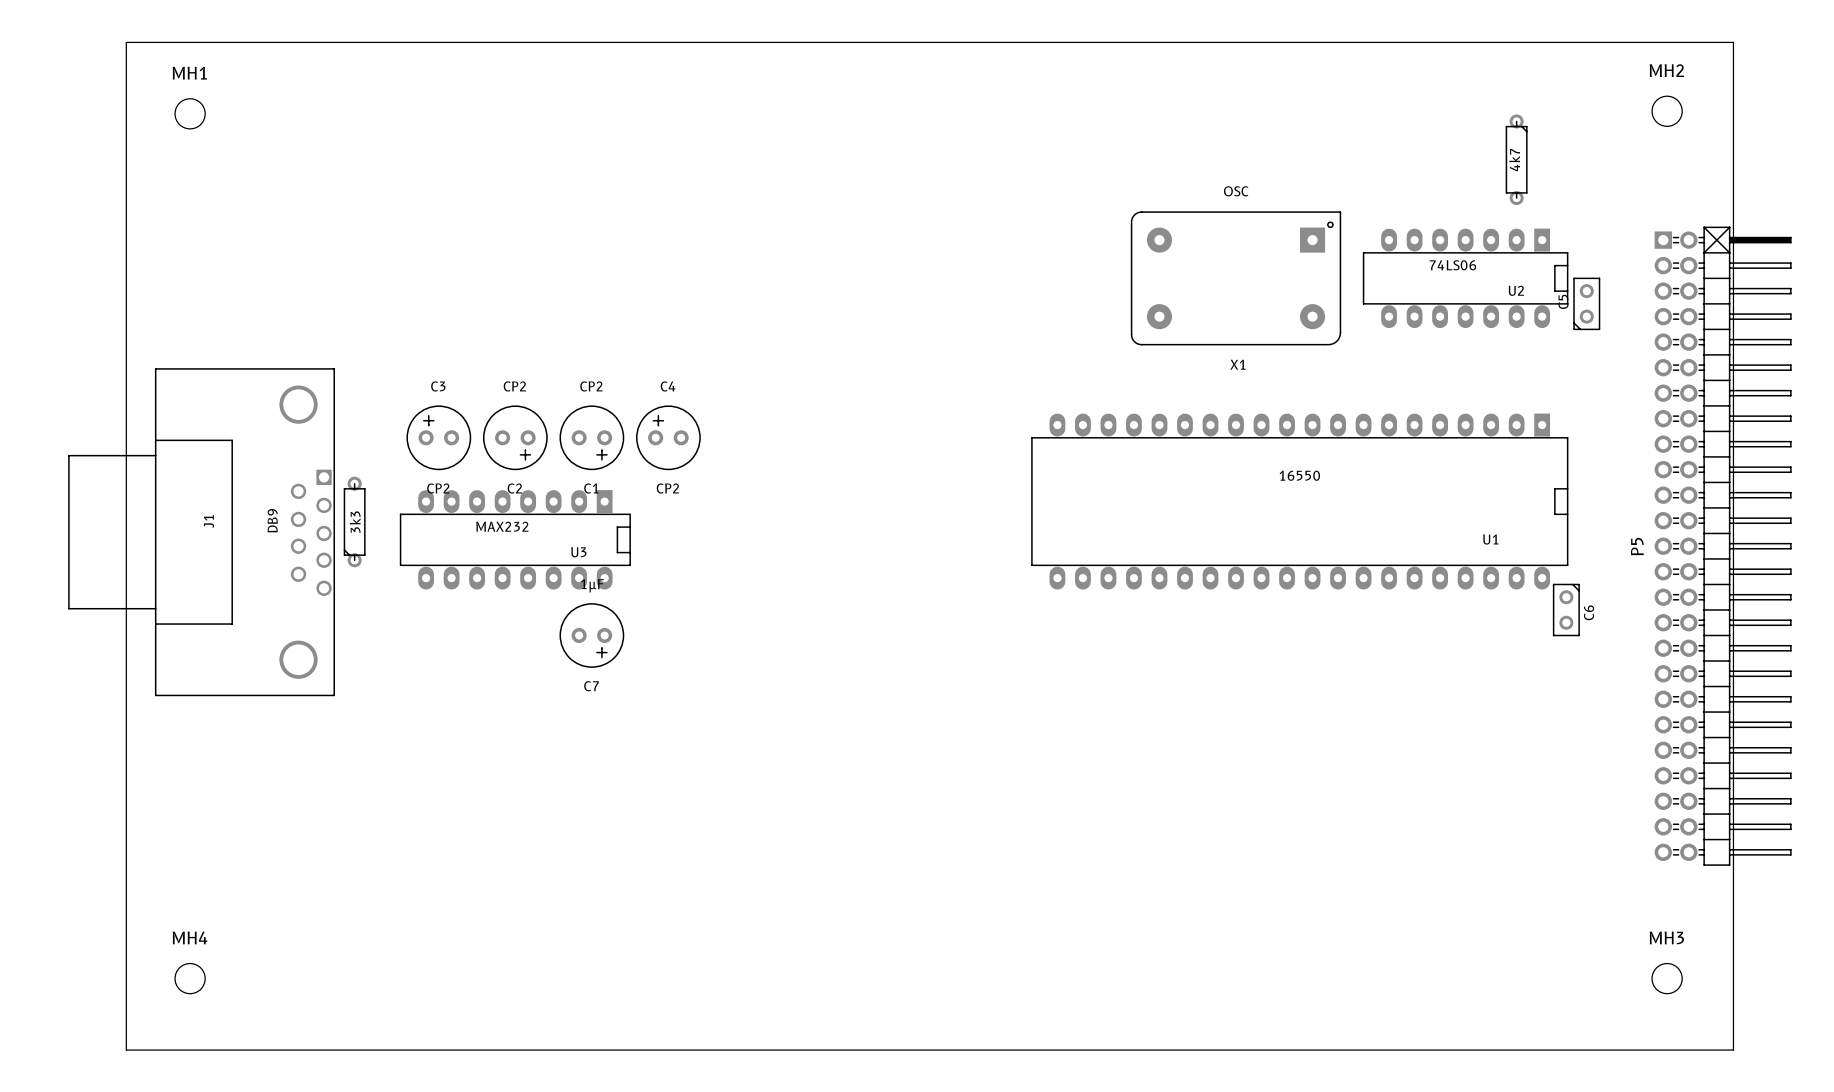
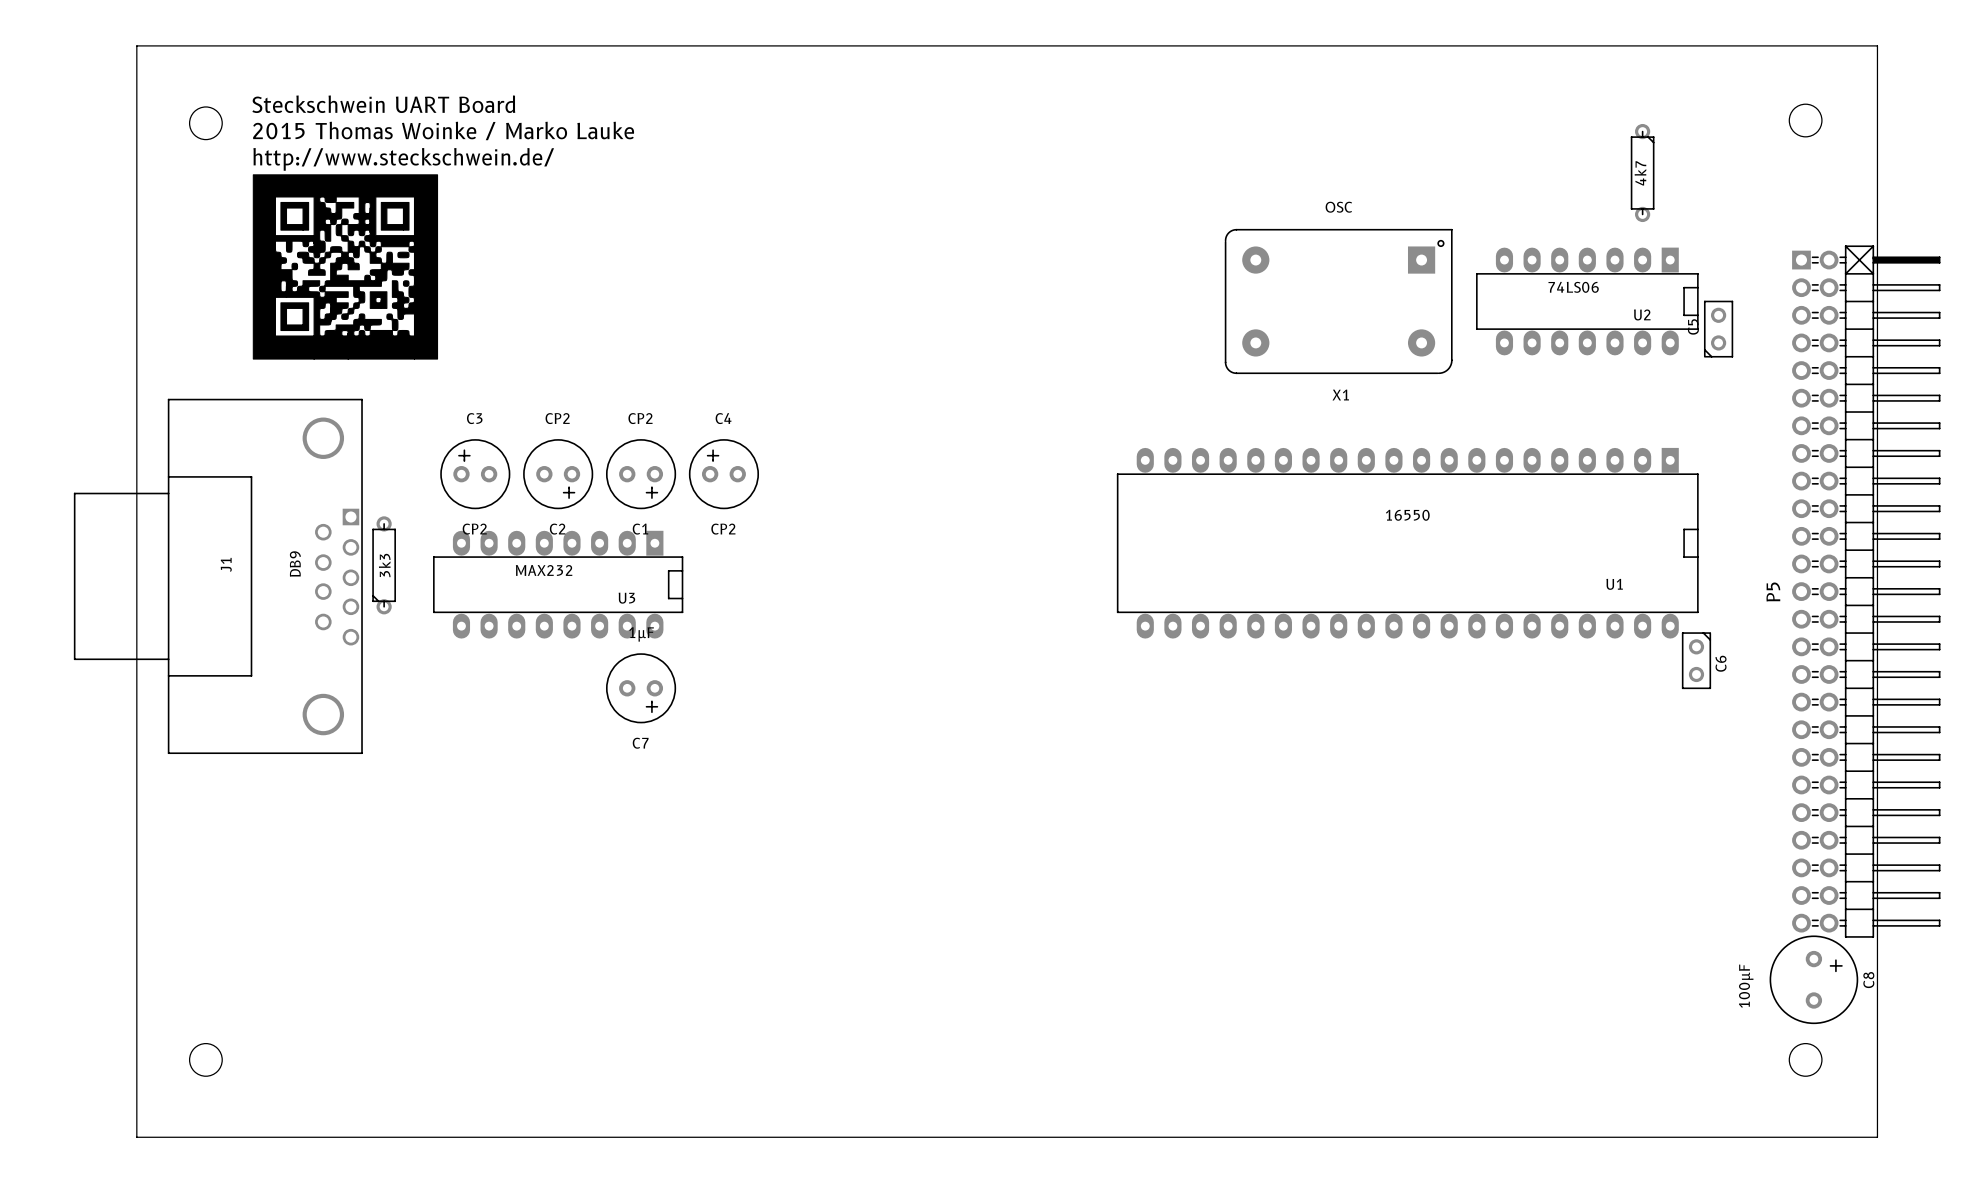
MH2 name: MH2 (1666, 70) -> none
MH1 name: MH1 (189, 73) -> none
text: none -> Steckschwein UART Board (383, 104)
text: none -> 2015 Thomas Woinke / Marko Lauke (443, 130)
text: none -> http://www.steckschwein.de/ (403, 159)
drawing: none -> [252, 174, 439, 360]
C8: none -> 100µF (1813, 979)
MH4 name: MH4 (189, 937) -> none
MH3 name: MH3 (1666, 937) -> none

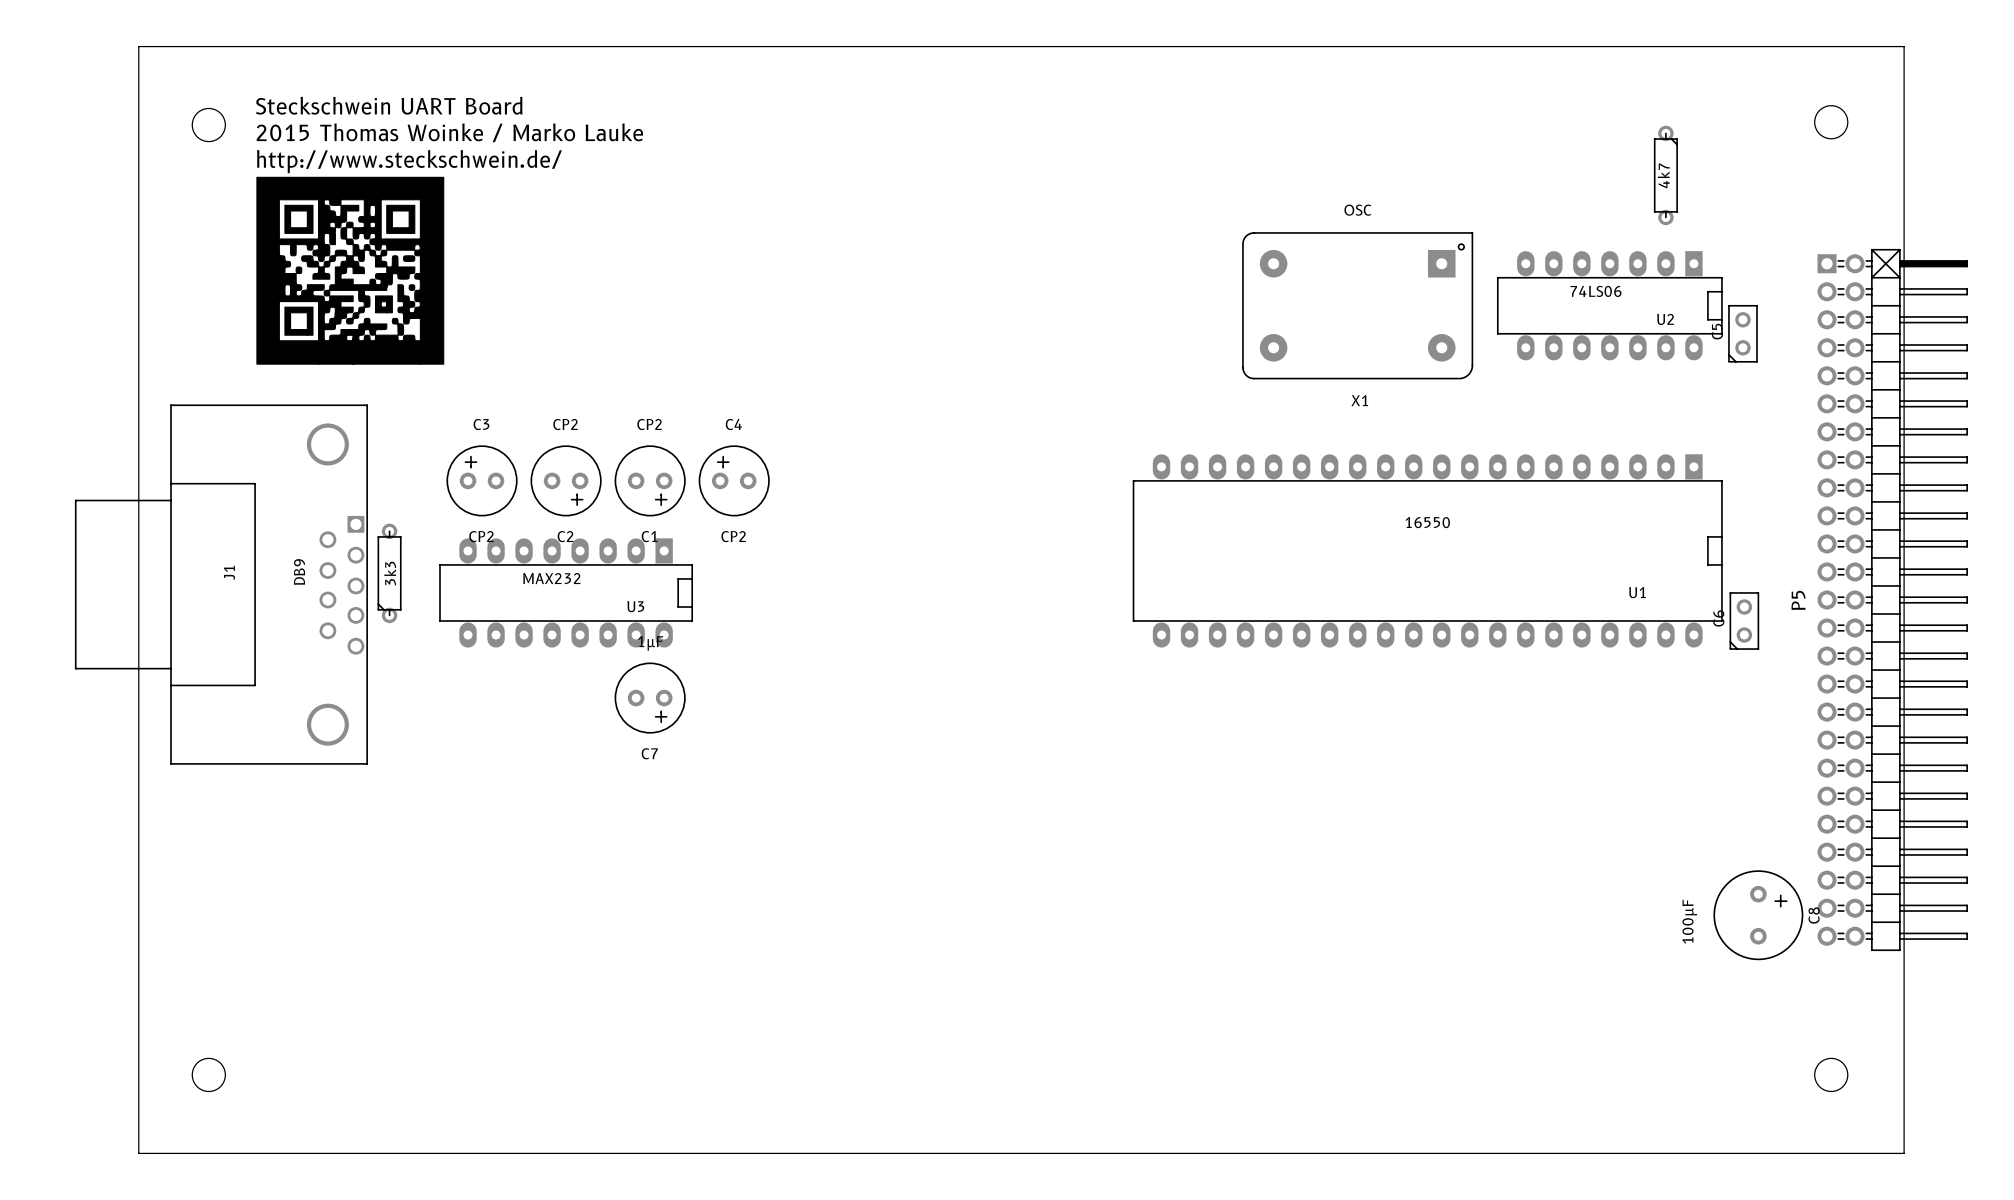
C6 rotation: 0° (1696, 660) -> 180° (1744, 621)
C6 position: (1696, 660) -> (1744, 621)
C8 position: (1813, 979) -> (1758, 915)

